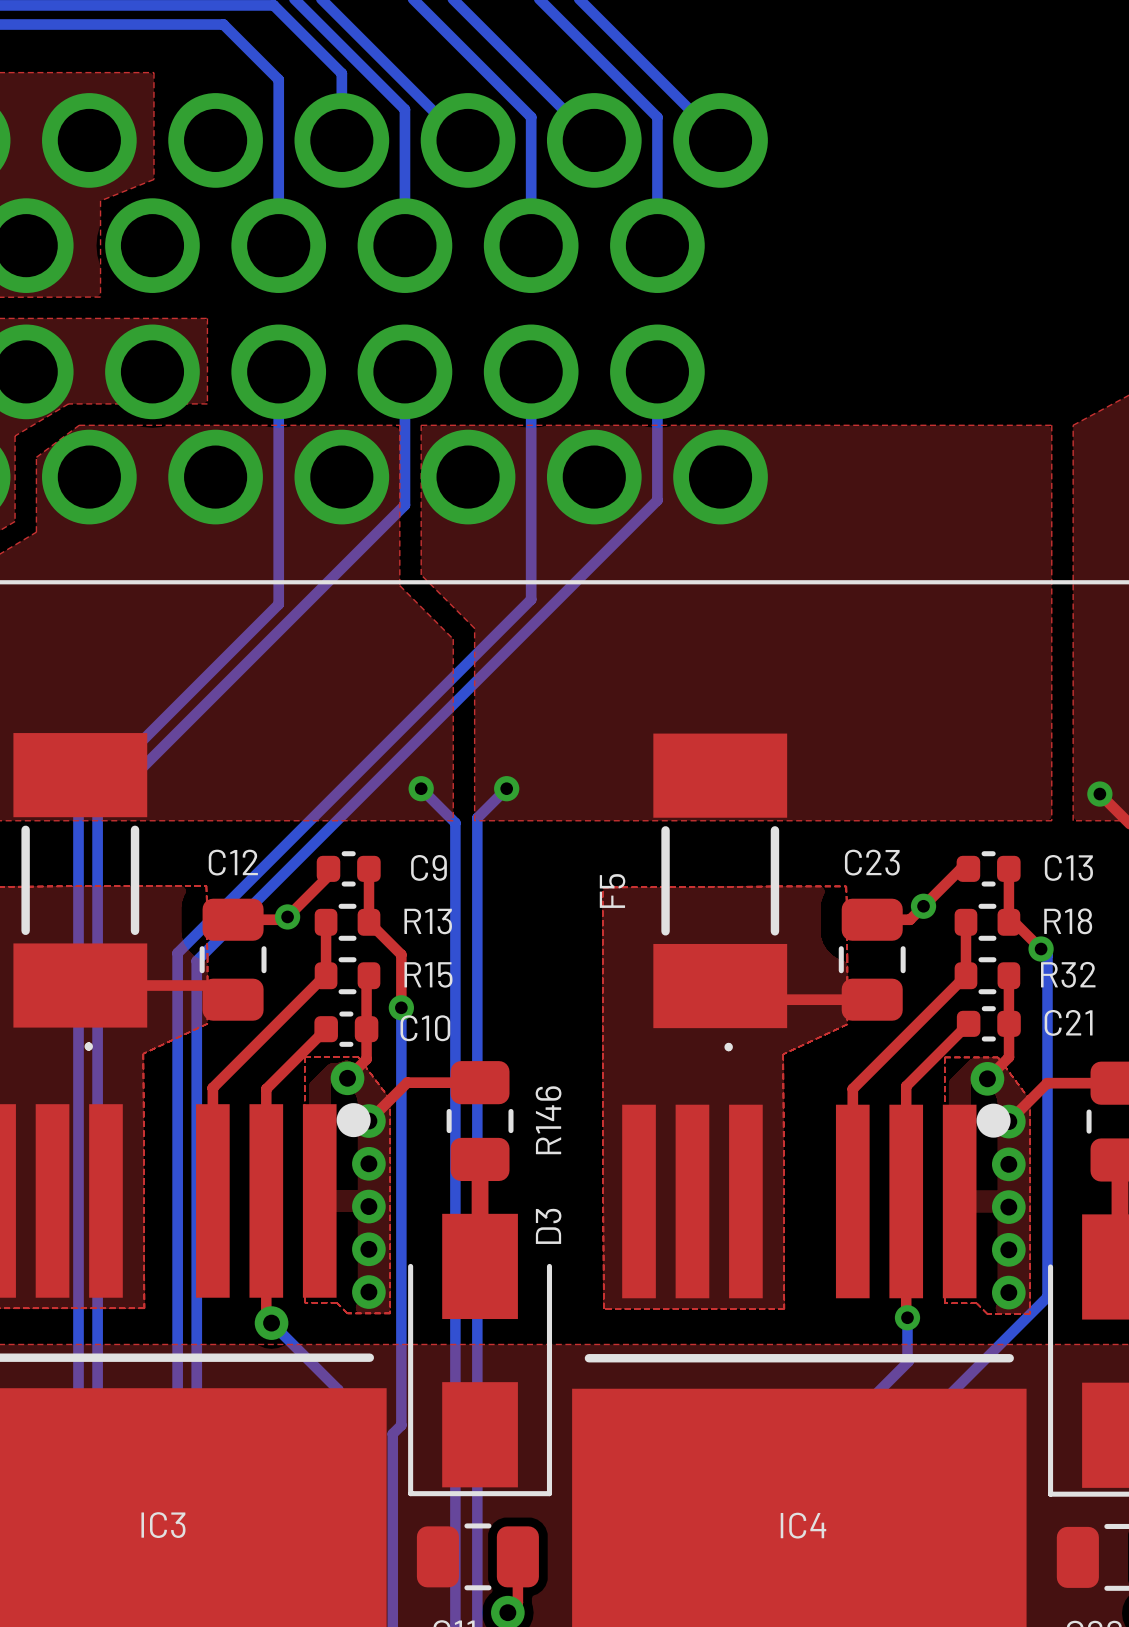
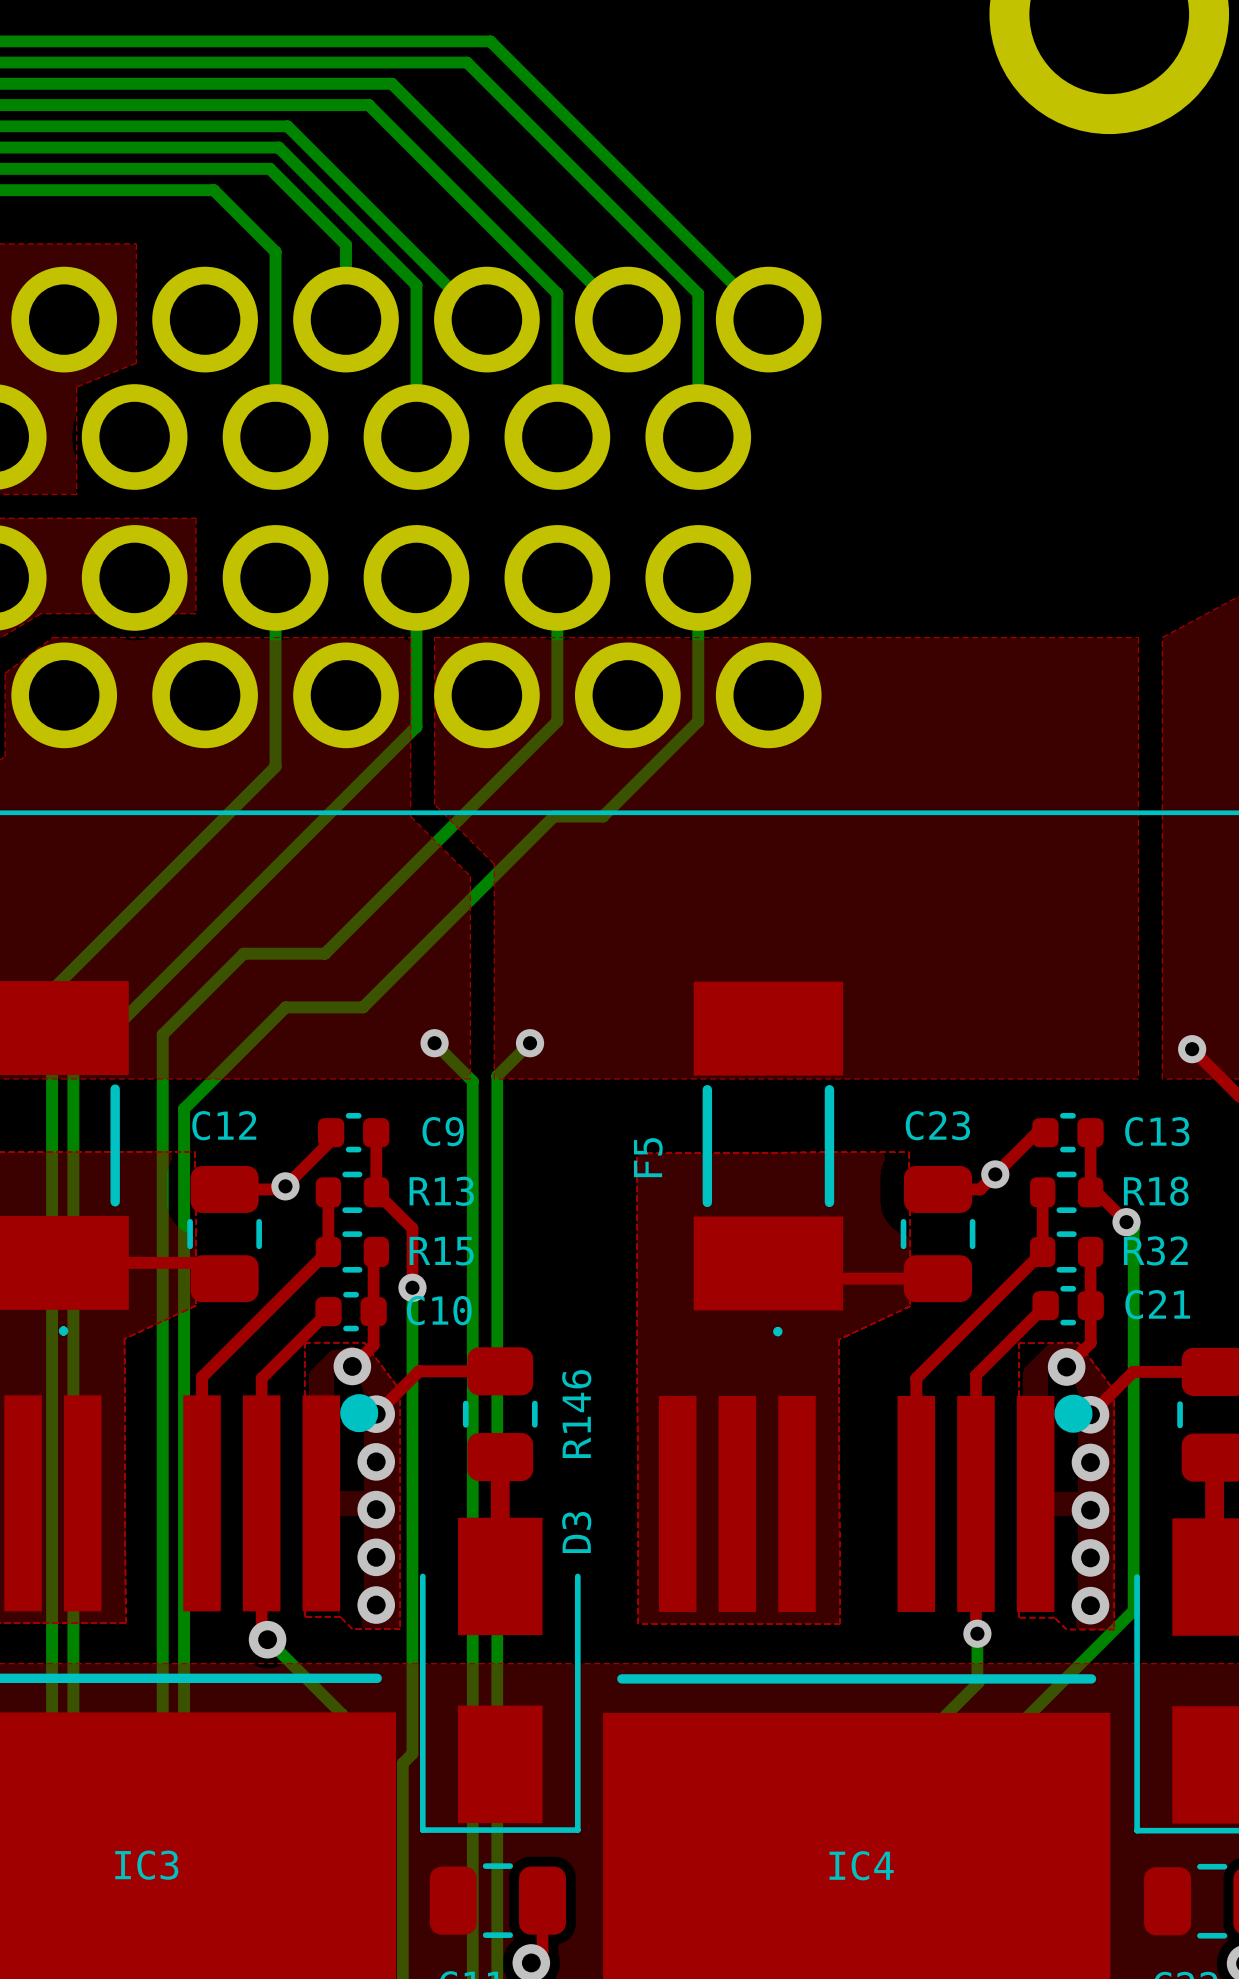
bottom track: (531, 500) (531, 599) (177, 953) -> (557, 721) (324, 953) (243, 953) (162, 1034) (162, 1226)
bottom track: (278, 541) (278, 604) (78, 804) -> (275, 766) (52, 990) (52, 1060)
bottom track: (572, 585) (196, 961) -> (603, 816) (553, 816) (363, 1007) (285, 1007) (184, 1108) (184, 1235)

